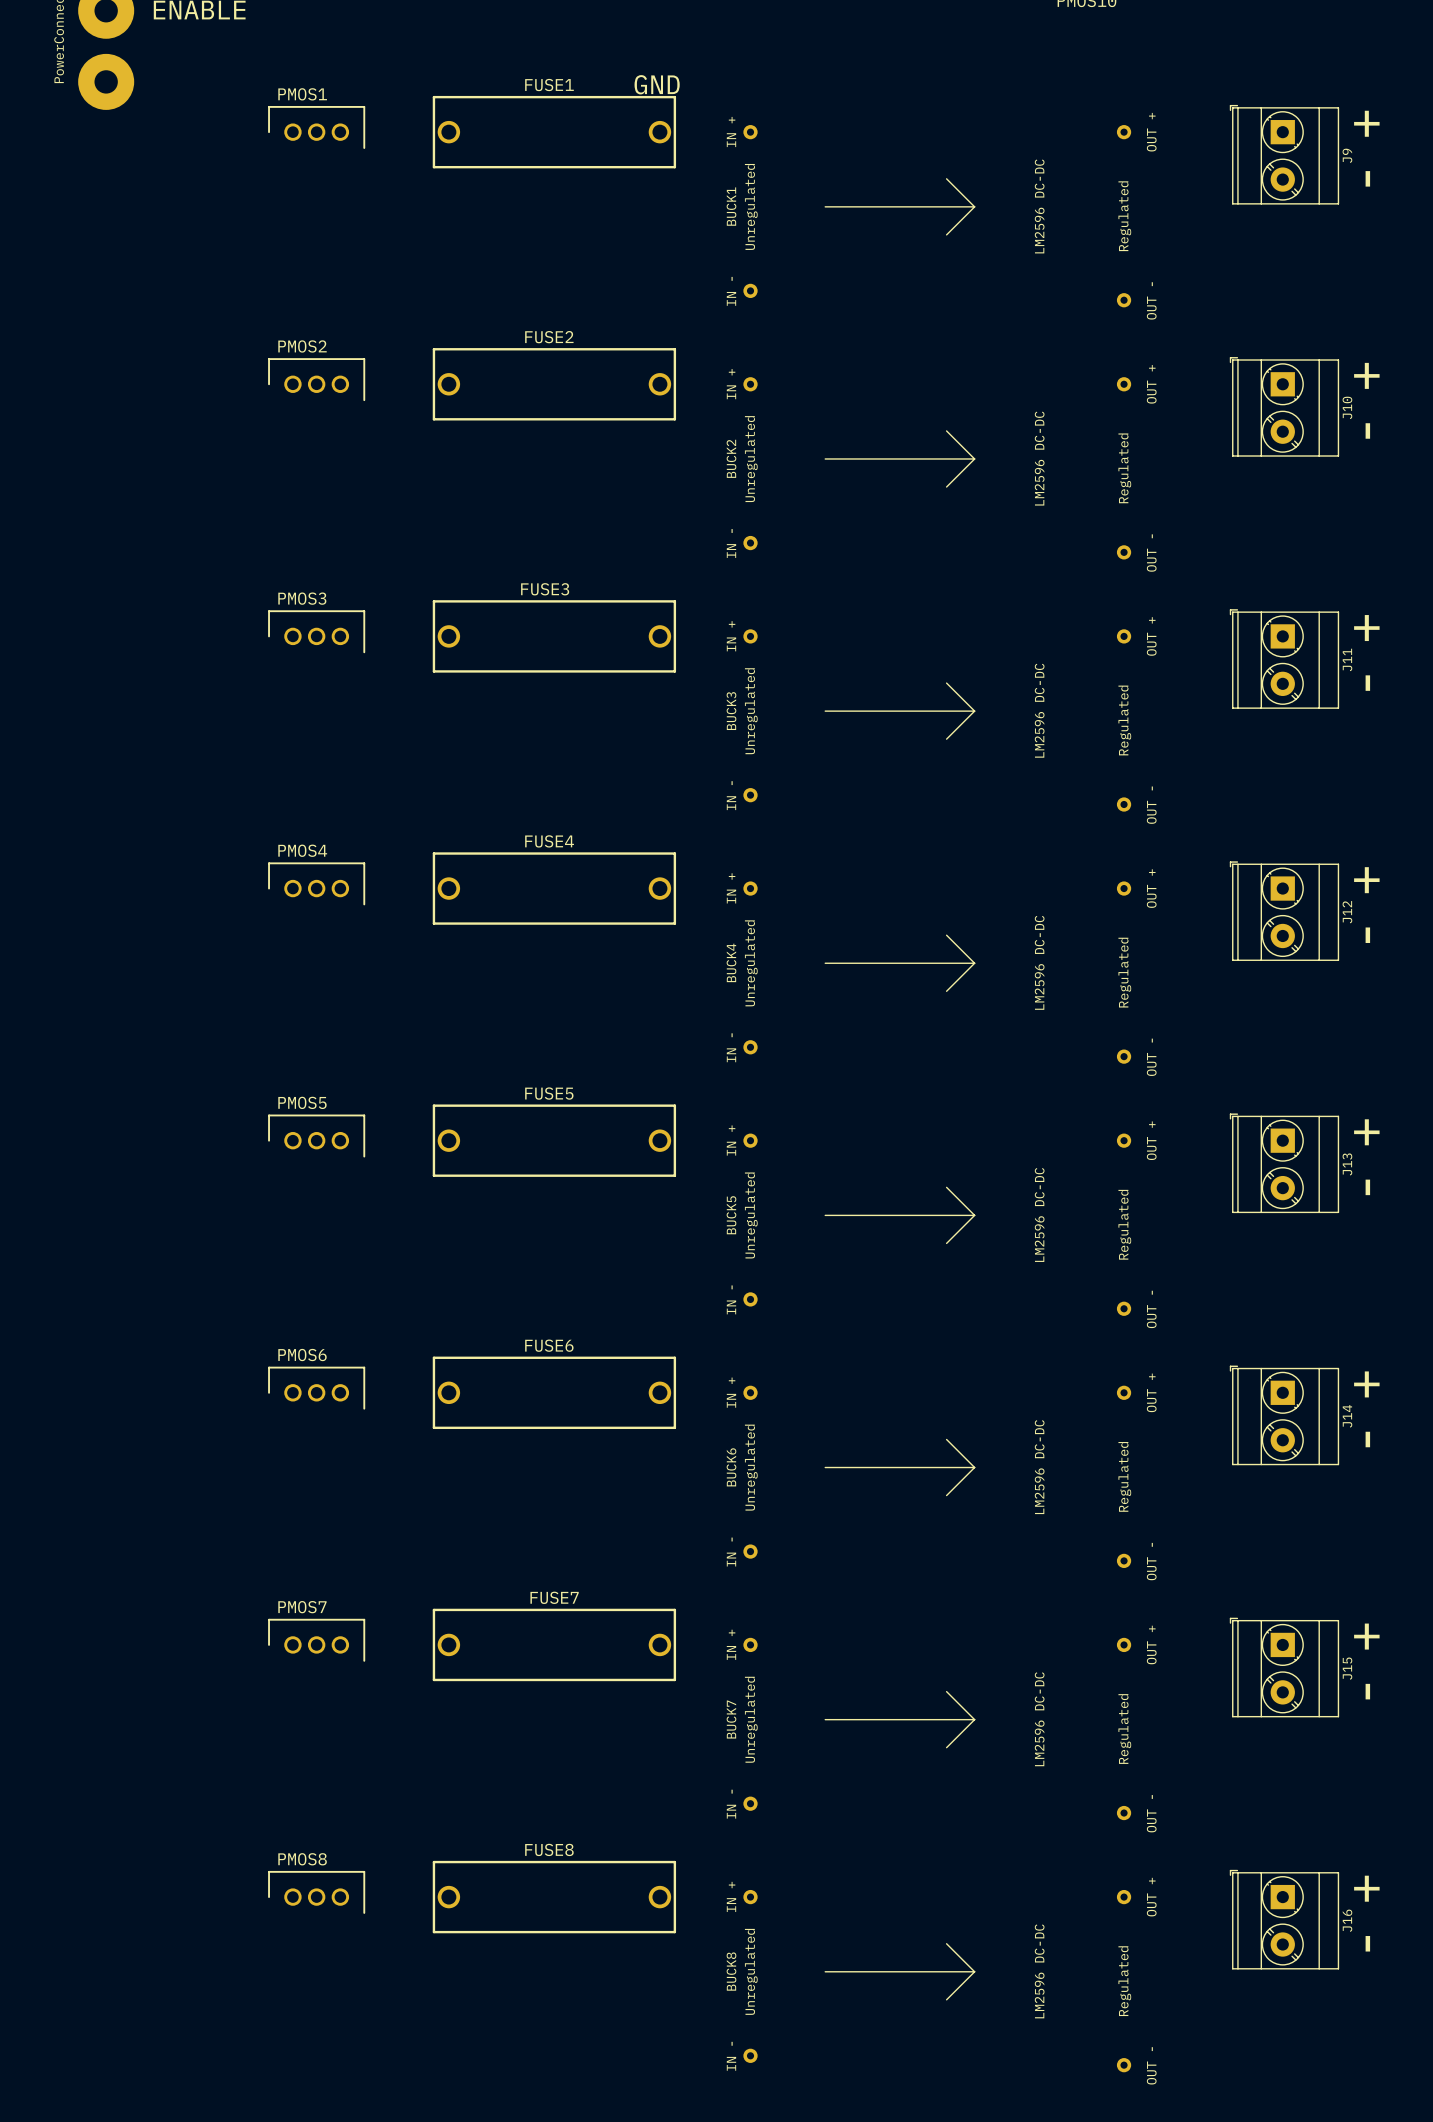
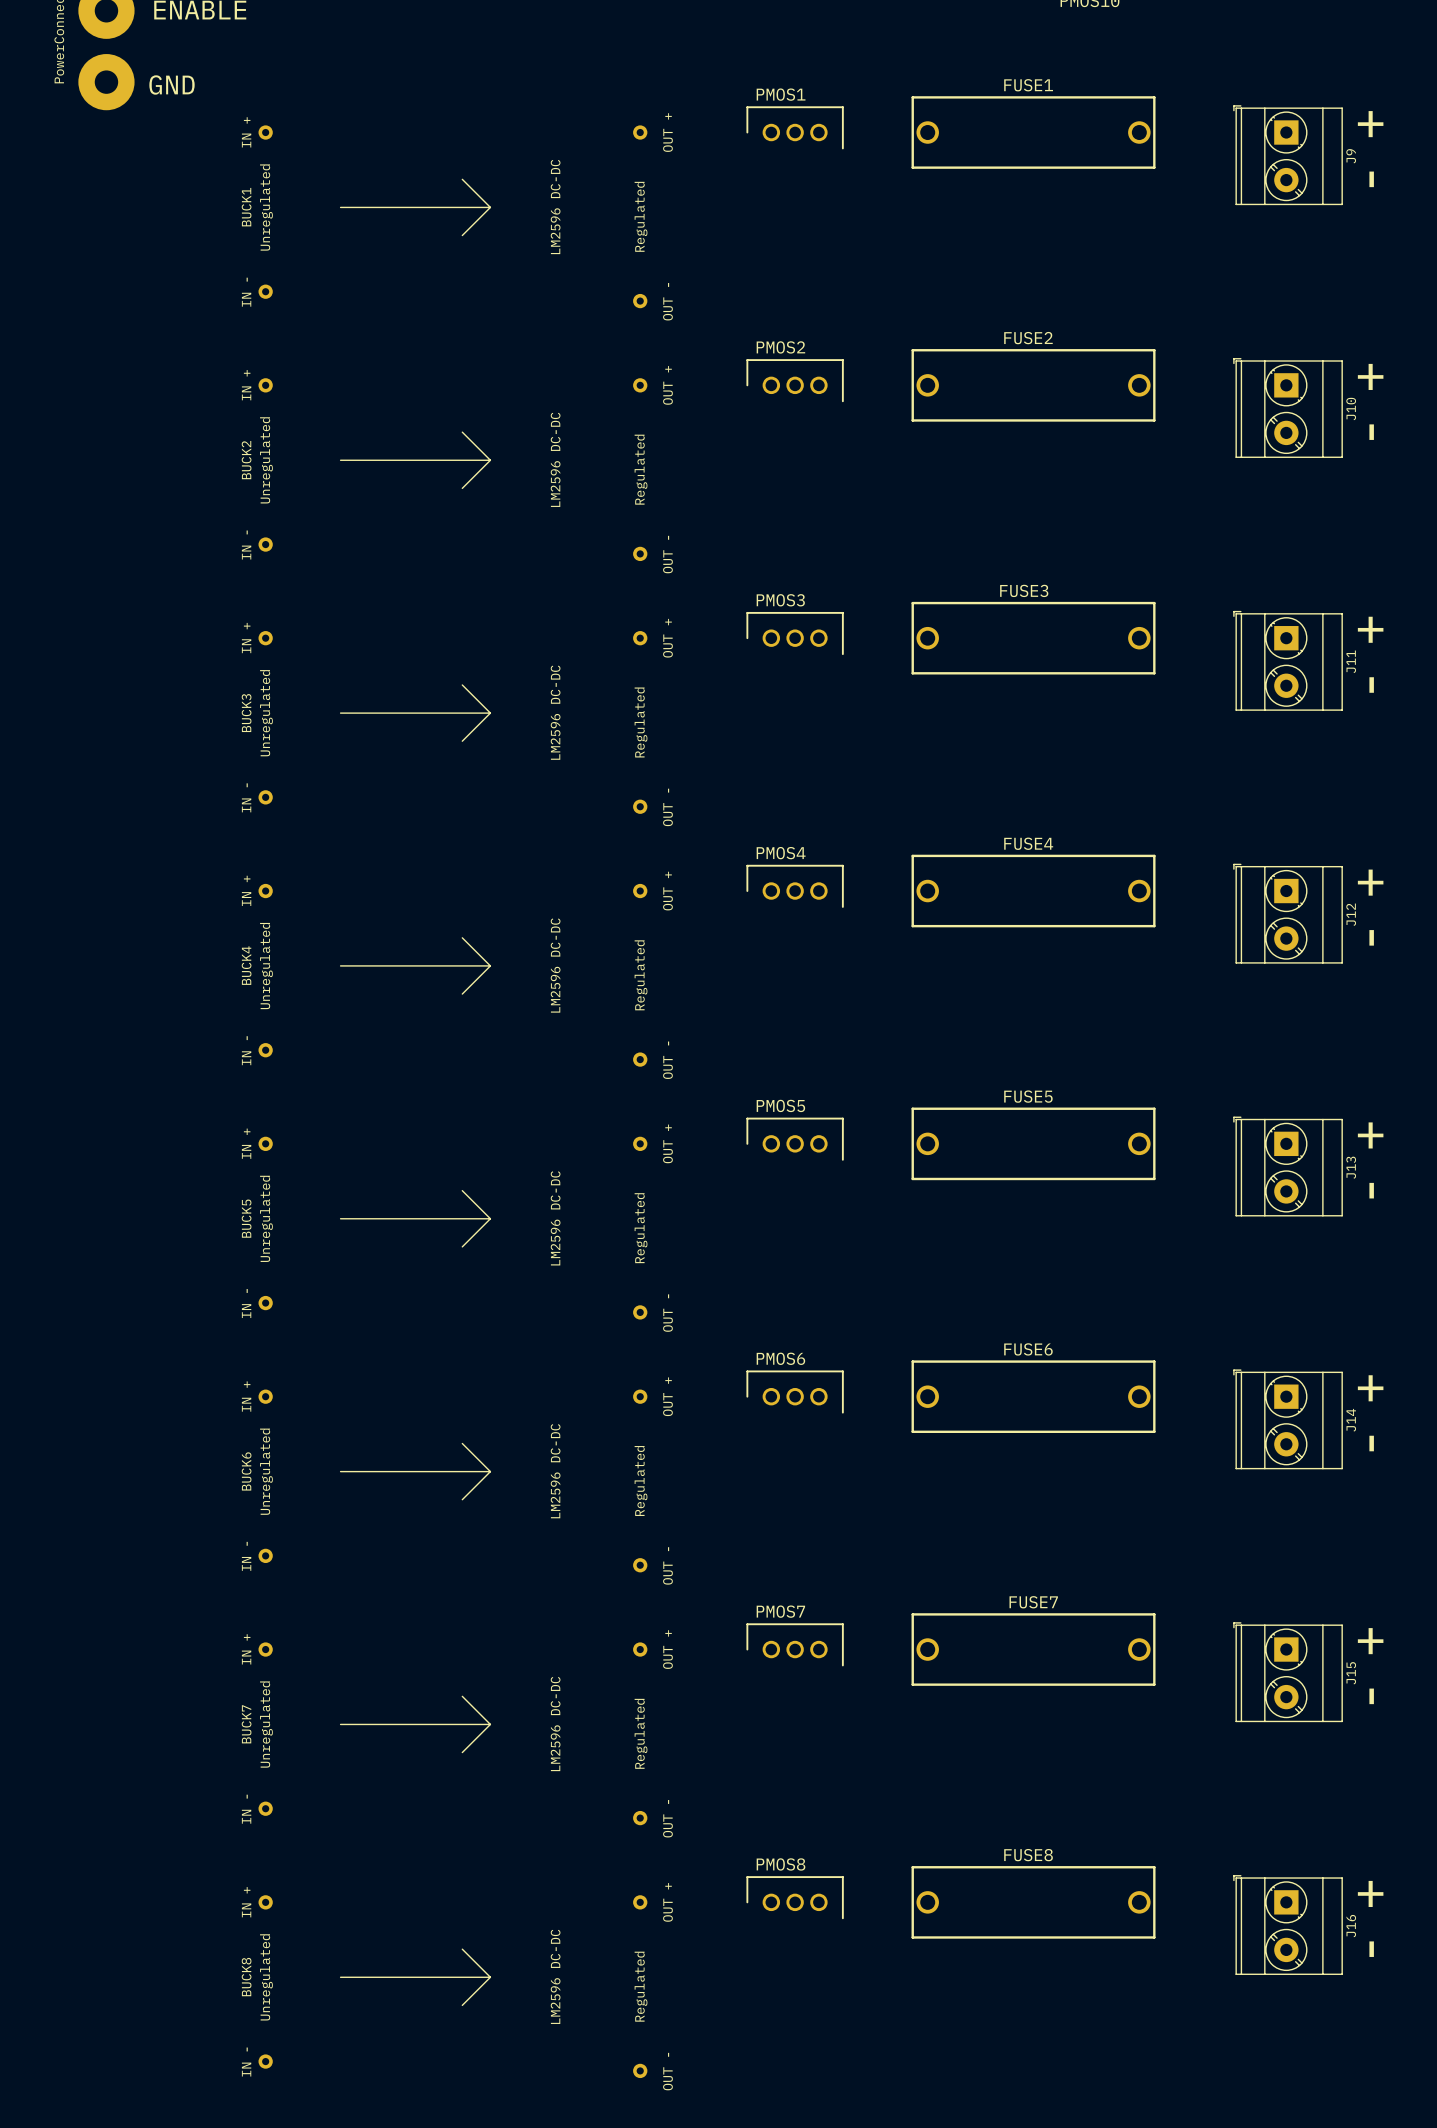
text: none -> GND (172, 84)
text: GND (657, 84) -> none
PMOS1 position: (316, 127) -> (795, 127)
FUSE1 position: (554, 132) -> (1033, 132)
BUCK1 position: (937, 216) -> (452, 216)
PMOS2 position: (316, 379) -> (795, 380)
FUSE2 position: (554, 384) -> (1033, 385)
BUCK2 position: (937, 468) -> (452, 469)
PMOS3 position: (316, 631) -> (795, 633)
FUSE3 position: (554, 636) -> (1033, 638)
BUCK3 position: (937, 720) -> (452, 722)
PMOS4 position: (316, 883) -> (795, 886)
FUSE4 position: (554, 888) -> (1033, 891)
BUCK4 position: (937, 972) -> (452, 975)
PMOS5 position: (316, 1136) -> (795, 1139)
FUSE5 position: (554, 1140) -> (1033, 1143)
BUCK5 position: (937, 1224) -> (452, 1228)
PMOS6 position: (316, 1388) -> (795, 1392)
FUSE6 position: (554, 1392) -> (1033, 1396)
BUCK6 position: (937, 1476) -> (452, 1480)
PMOS7 position: (316, 1640) -> (795, 1644)
FUSE7 position: (554, 1644) -> (1033, 1649)
BUCK7 position: (937, 1728) -> (452, 1733)
PMOS8 position: (316, 1892) -> (795, 1897)
FUSE8 position: (554, 1897) -> (1033, 1902)
BUCK8 position: (937, 1981) -> (452, 1986)

